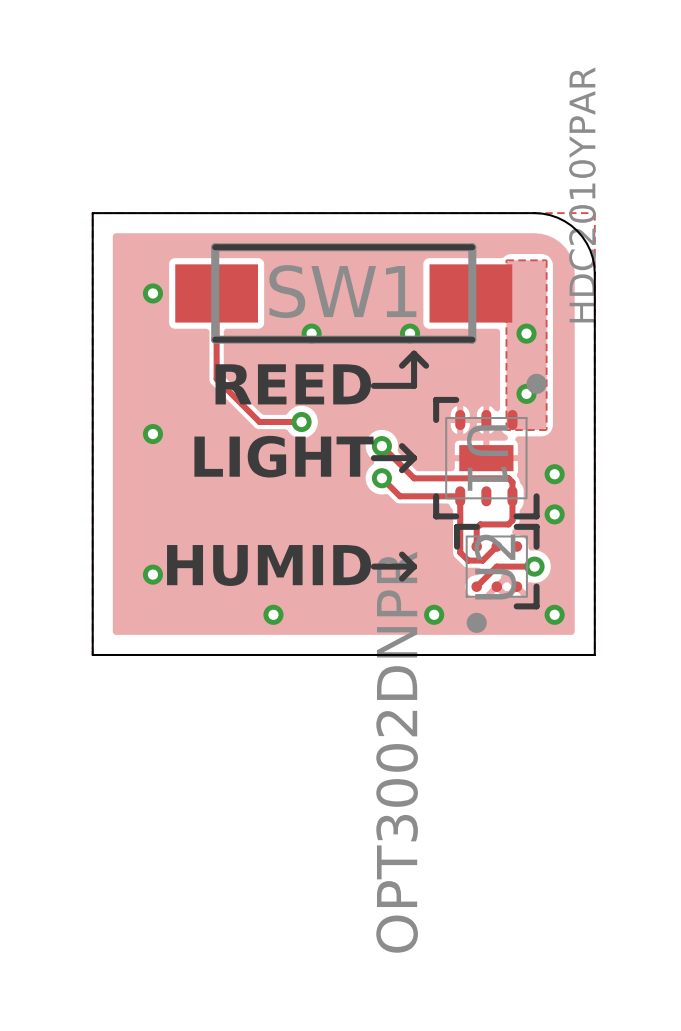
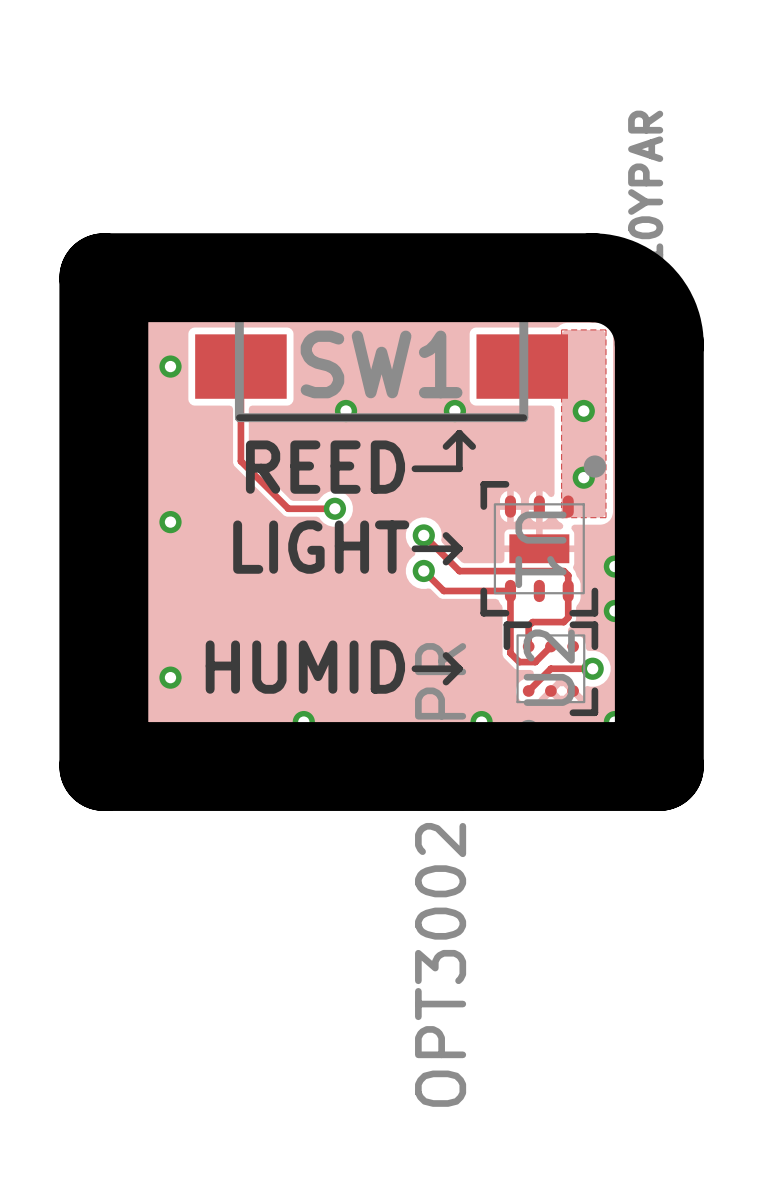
board edge width: thin (92, 213) (534, 213) (557, 217) (577, 230) (590, 250) (594, 273) (594, 654) (92, 654) (92, 213) -> thick (103, 277) (592, 277) (618, 282) (639, 297) (654, 318) (659, 344) (659, 766) (103, 766) (103, 277)

